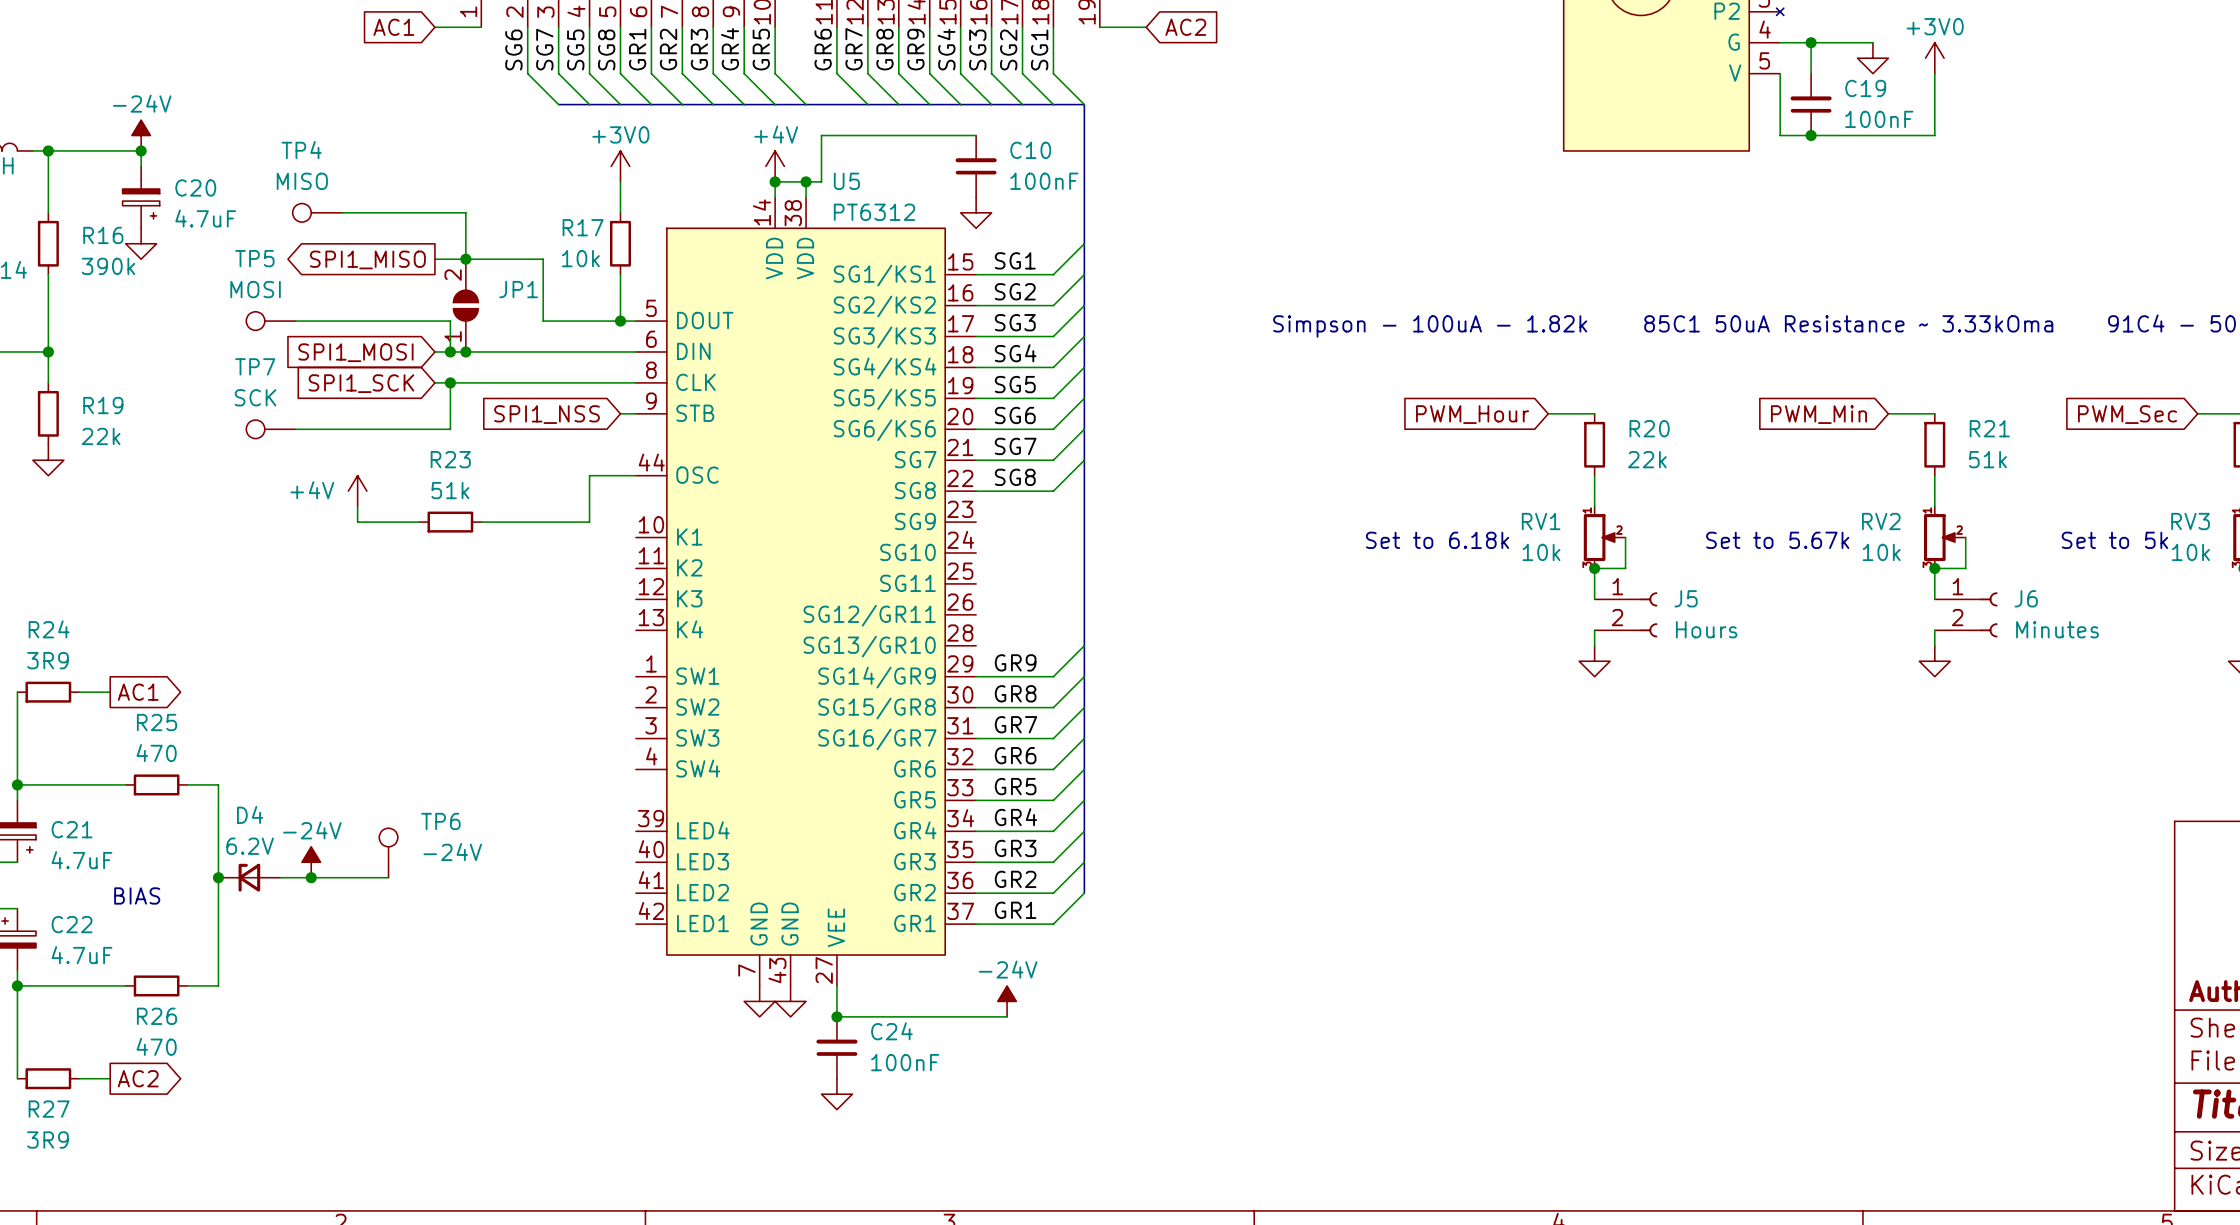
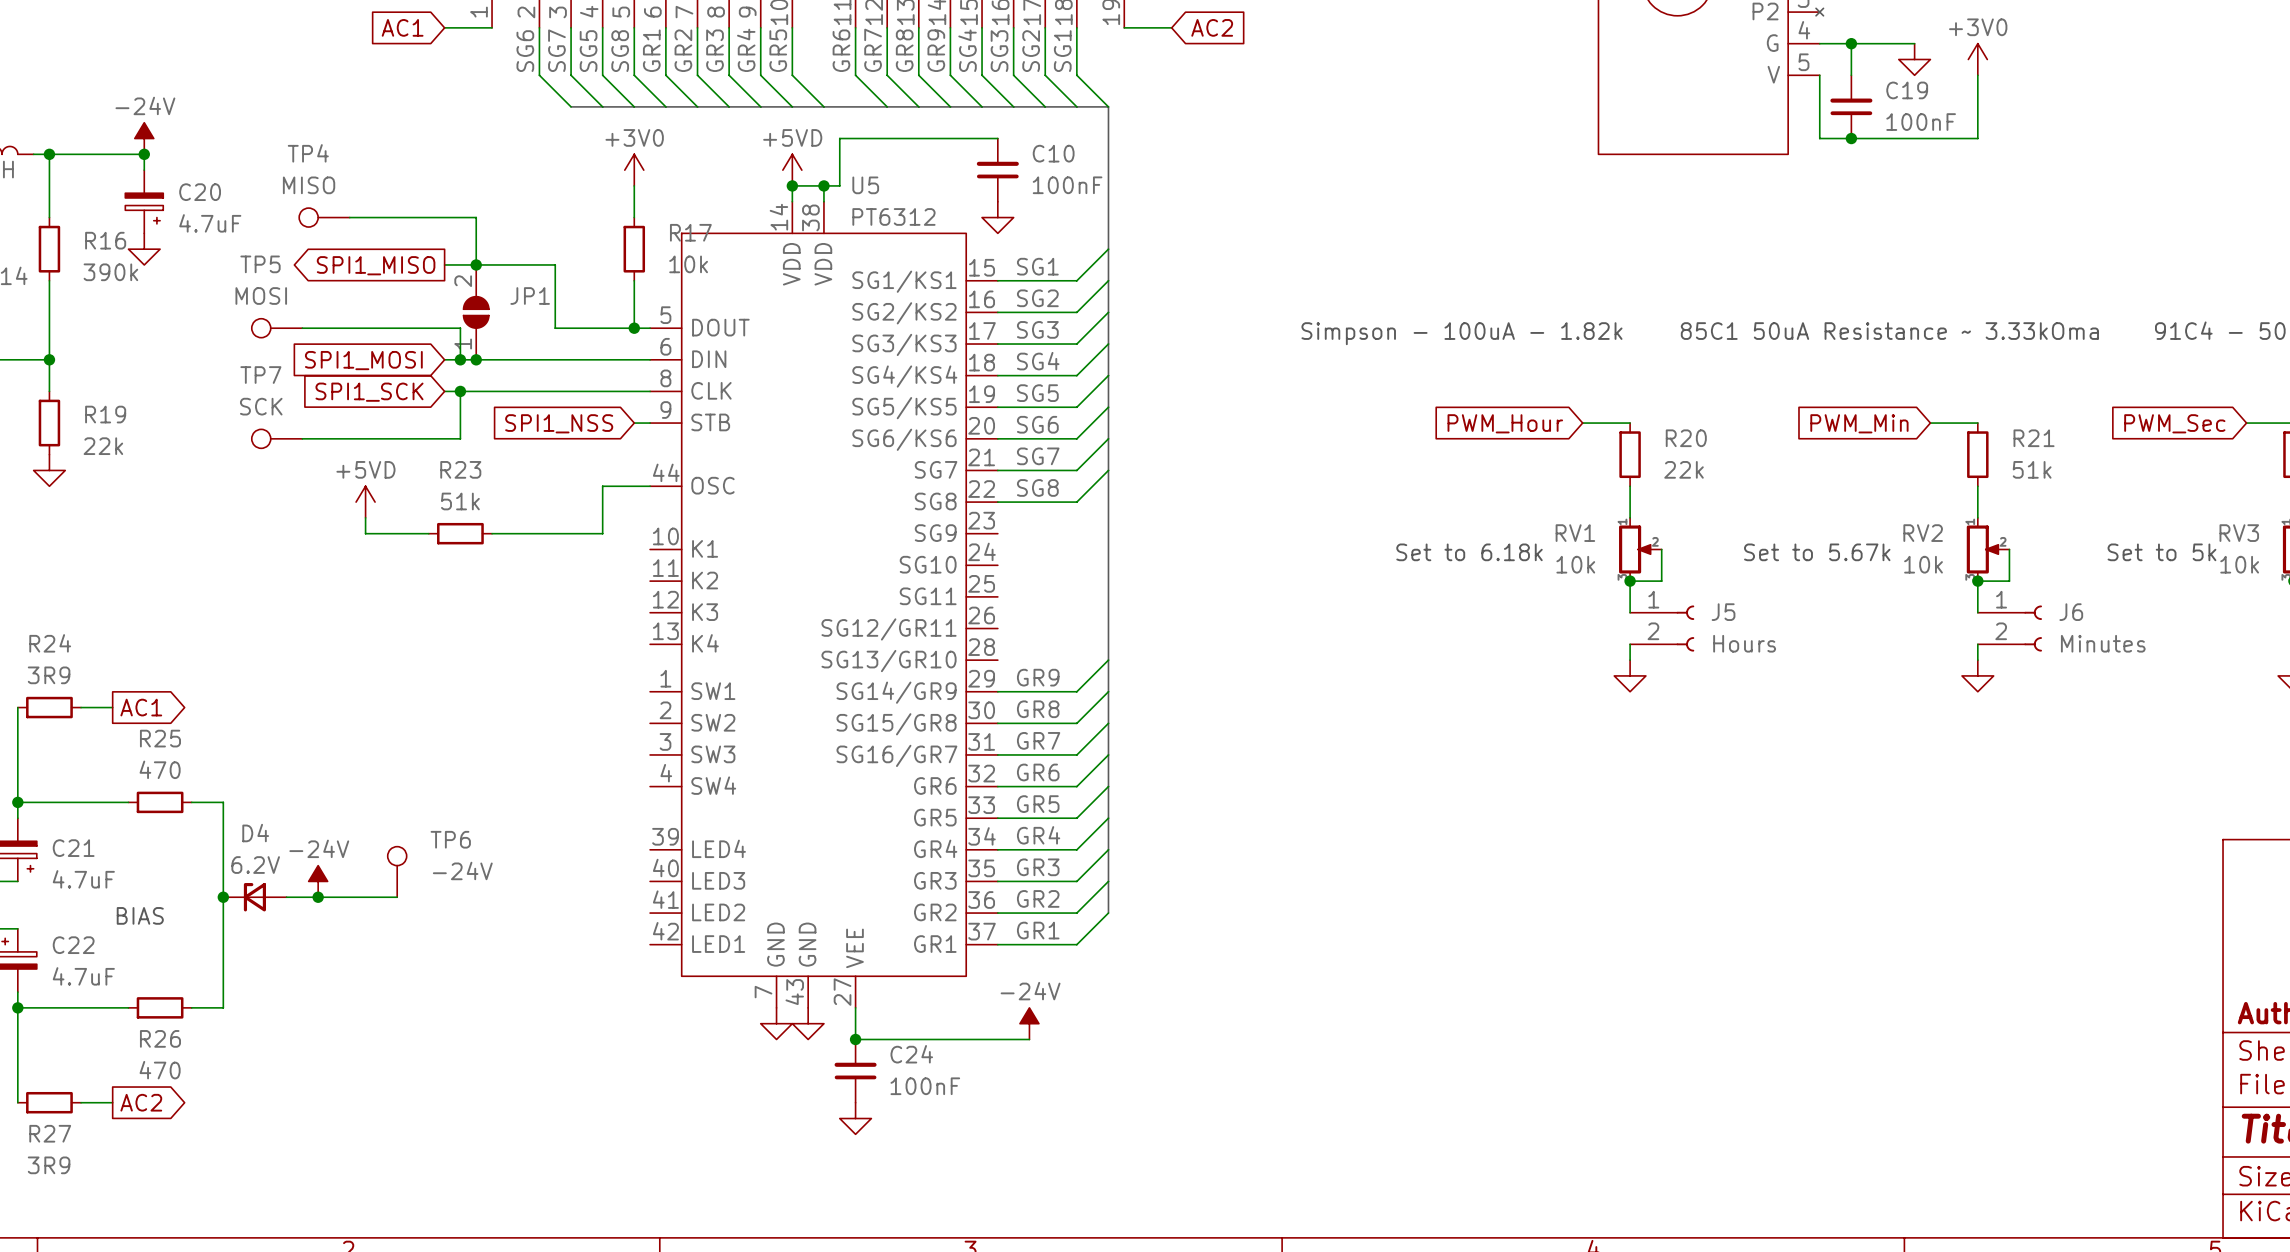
power symbol: +4V (775, 166) -> +5VD (792, 170)
R17 name position: R17 (583, 227) -> R17 (690, 232)
R17 value position: 10k (580, 258) -> 10k (688, 264)
power symbol: +4V (357, 491) -> +5VD (365, 502)

